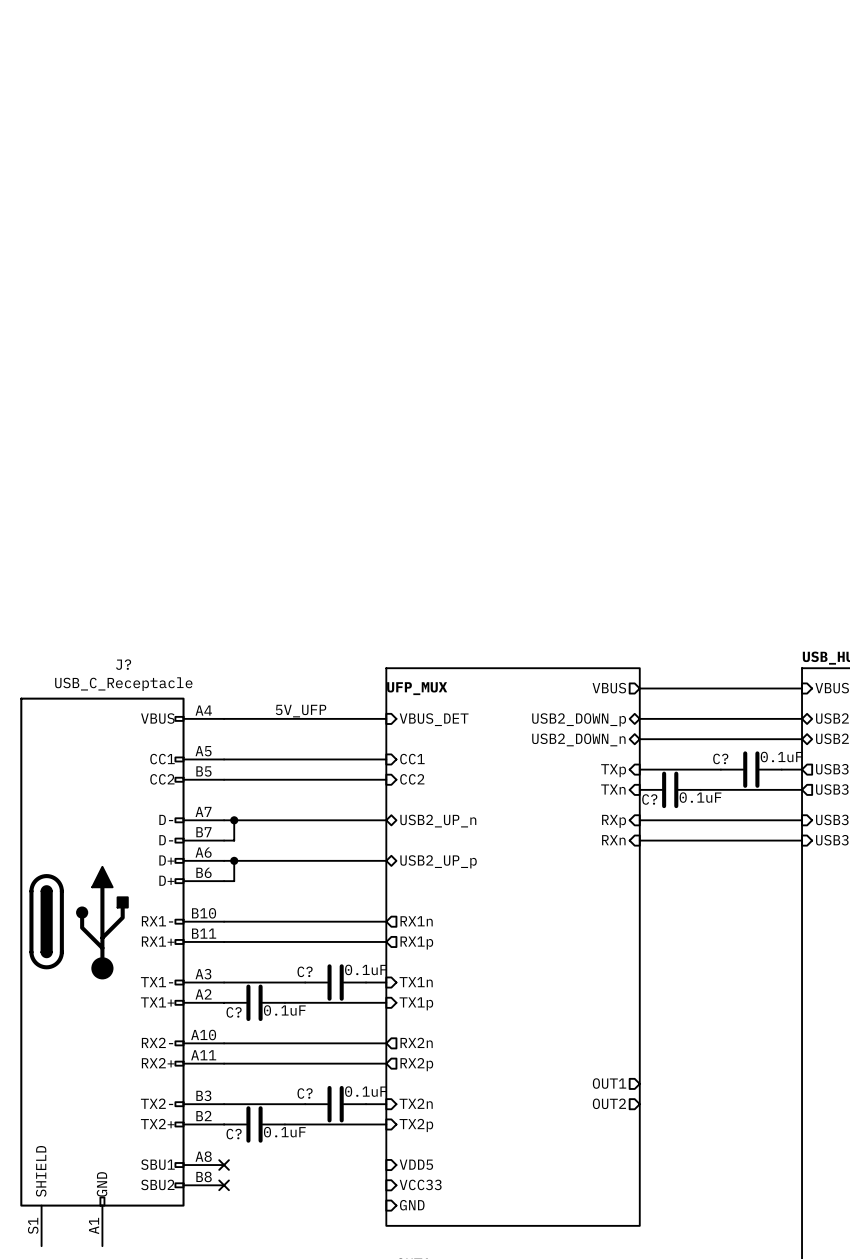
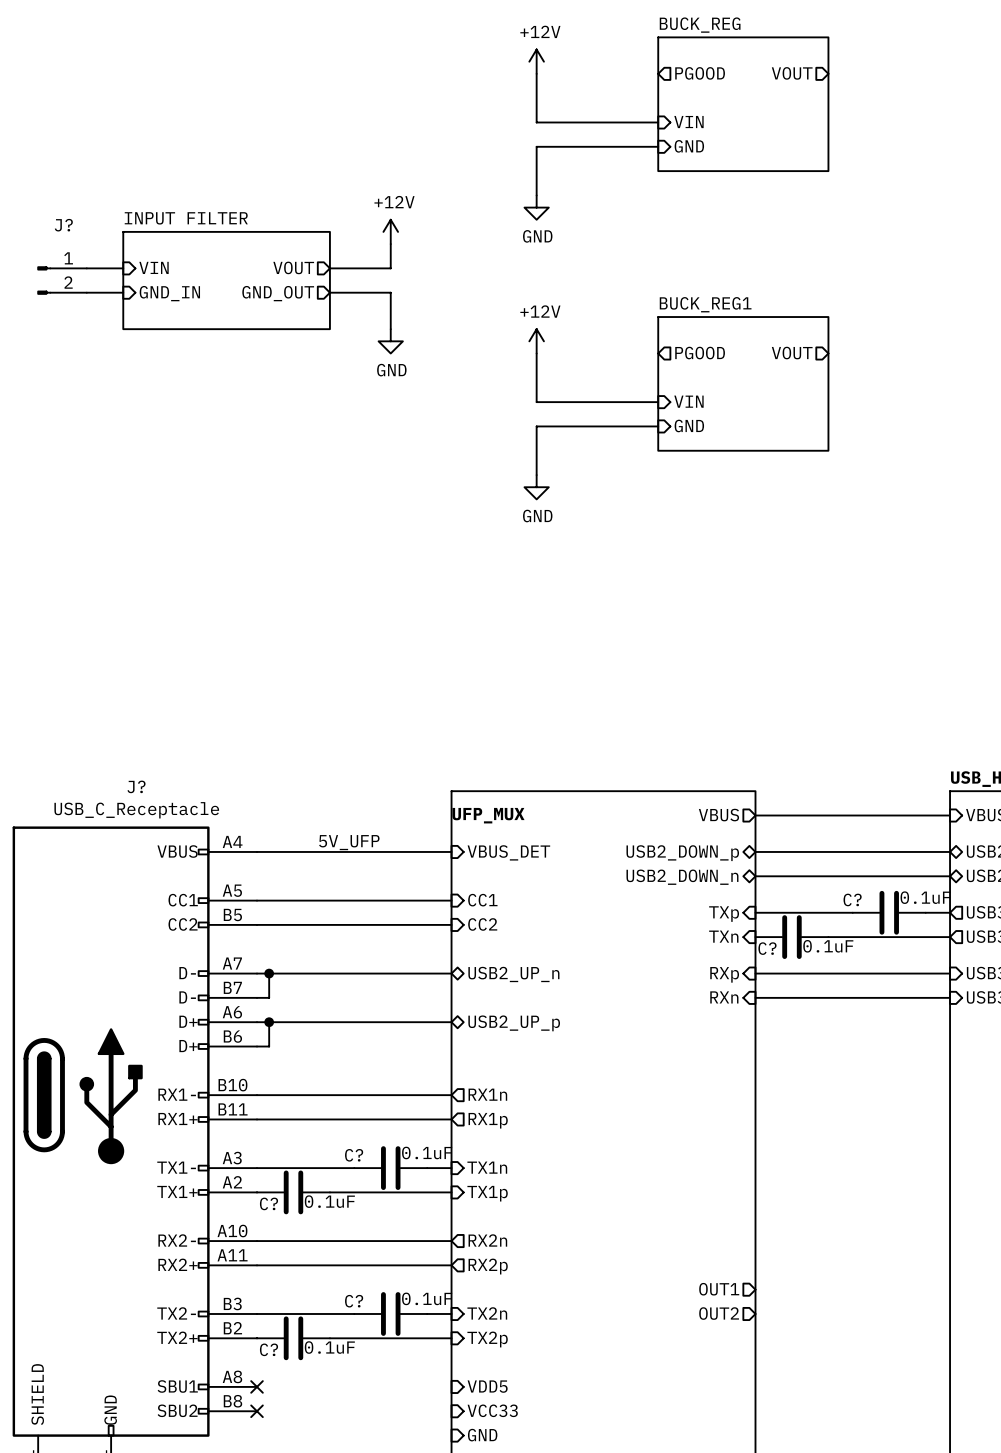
power symbol: none -> +12V (536, 61)
sheet pin: none -> PGOOD (700, 73)
sheet pin: none -> VOUT (792, 73)
wire: none -> (536, 73) (536, 122) (658, 122)
sheet BUCK_REG: none -> (743, 104)
sheet pin: none -> VIN (688, 122)
wire: none -> (658, 146) (536, 146) (536, 195)
sheet pin: none -> GND (689, 146)
power symbol: none -> GND (536, 207)
power symbol: none -> +12V (390, 231)
wire: none -> (390, 244) (390, 268) (329, 268)
sheet pin: none -> VIN (154, 267)
sheet pin: none -> VOUT (293, 267)
wire: none -> (86, 268) (123, 268)
J?: none -> (62, 280)
sheet INPUT FILTER: none -> (226, 280)
wire: none -> (86, 292) (123, 292)
wire: none -> (329, 292) (390, 292) (390, 329)
sheet pin: none -> GND_IN (169, 293)
sheet pin: none -> GND_OUT (278, 293)
power symbol: none -> GND (390, 341)
power symbol: none -> +12V (536, 341)
sheet pin: none -> PGOOD (700, 353)
sheet pin: none -> VOUT (792, 353)
wire: none -> (536, 353) (536, 402) (658, 402)
sheet BUCK_REG1: none -> (743, 383)
sheet pin: none -> VIN (688, 401)
sheet pin: none -> GND (689, 425)
wire: none -> (658, 426) (536, 426) (536, 475)
power symbol: none -> GND (536, 487)

